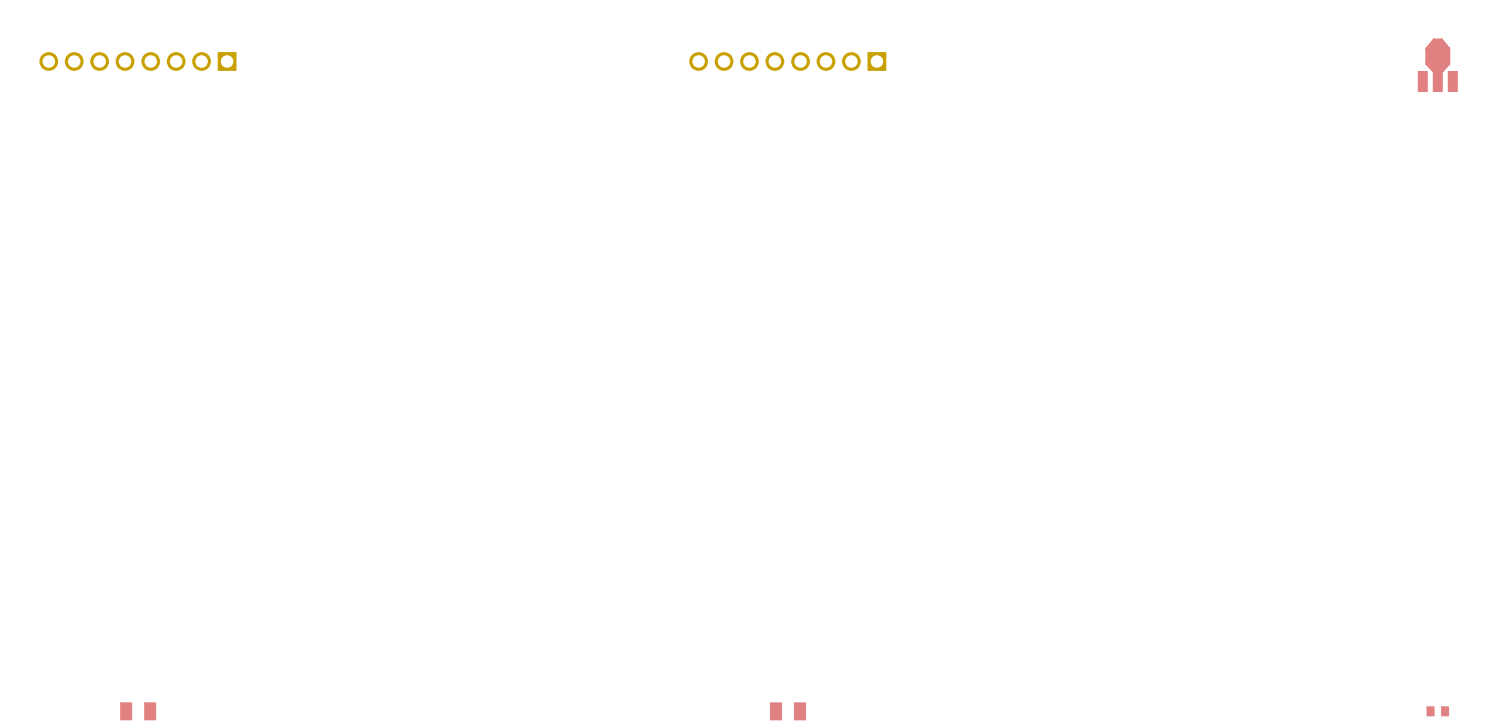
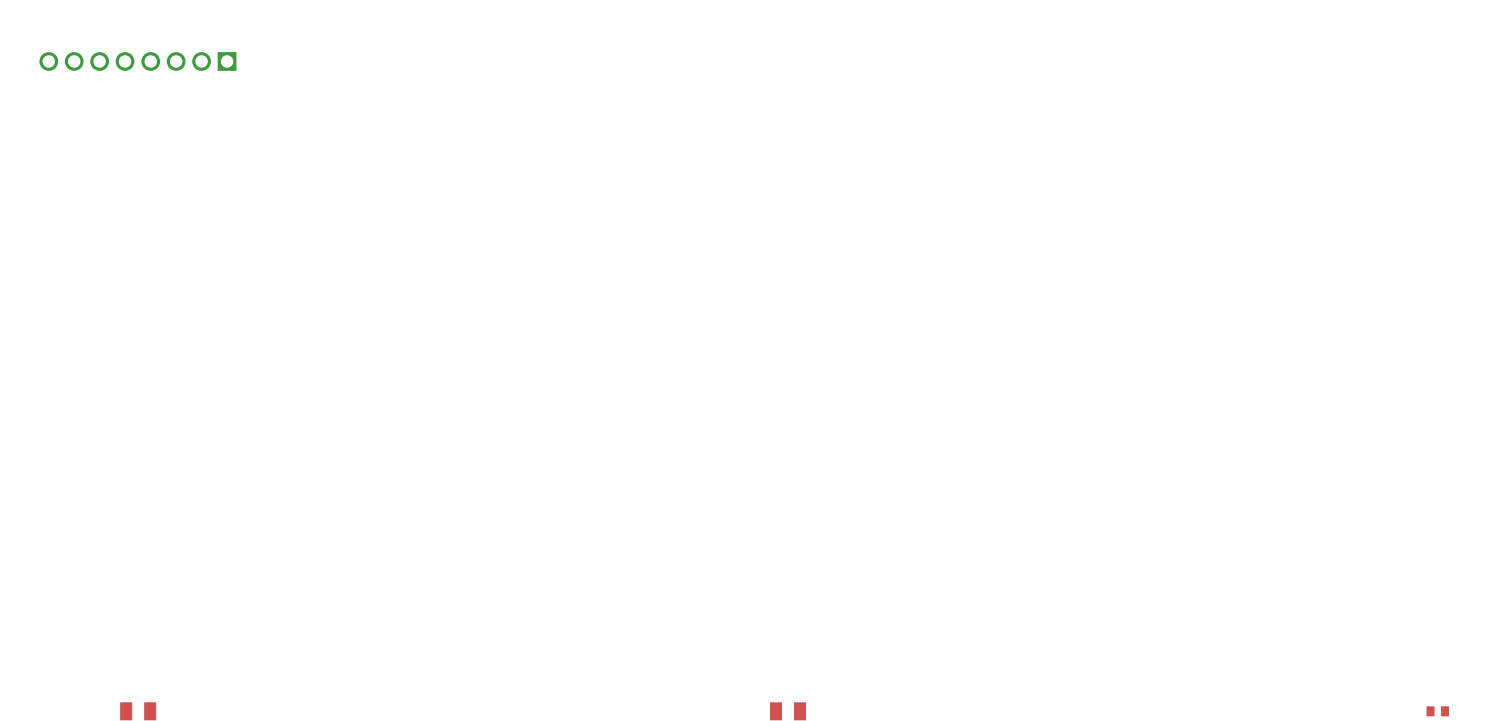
part: (787, 61) -> none
part: (1437, 65) -> none

